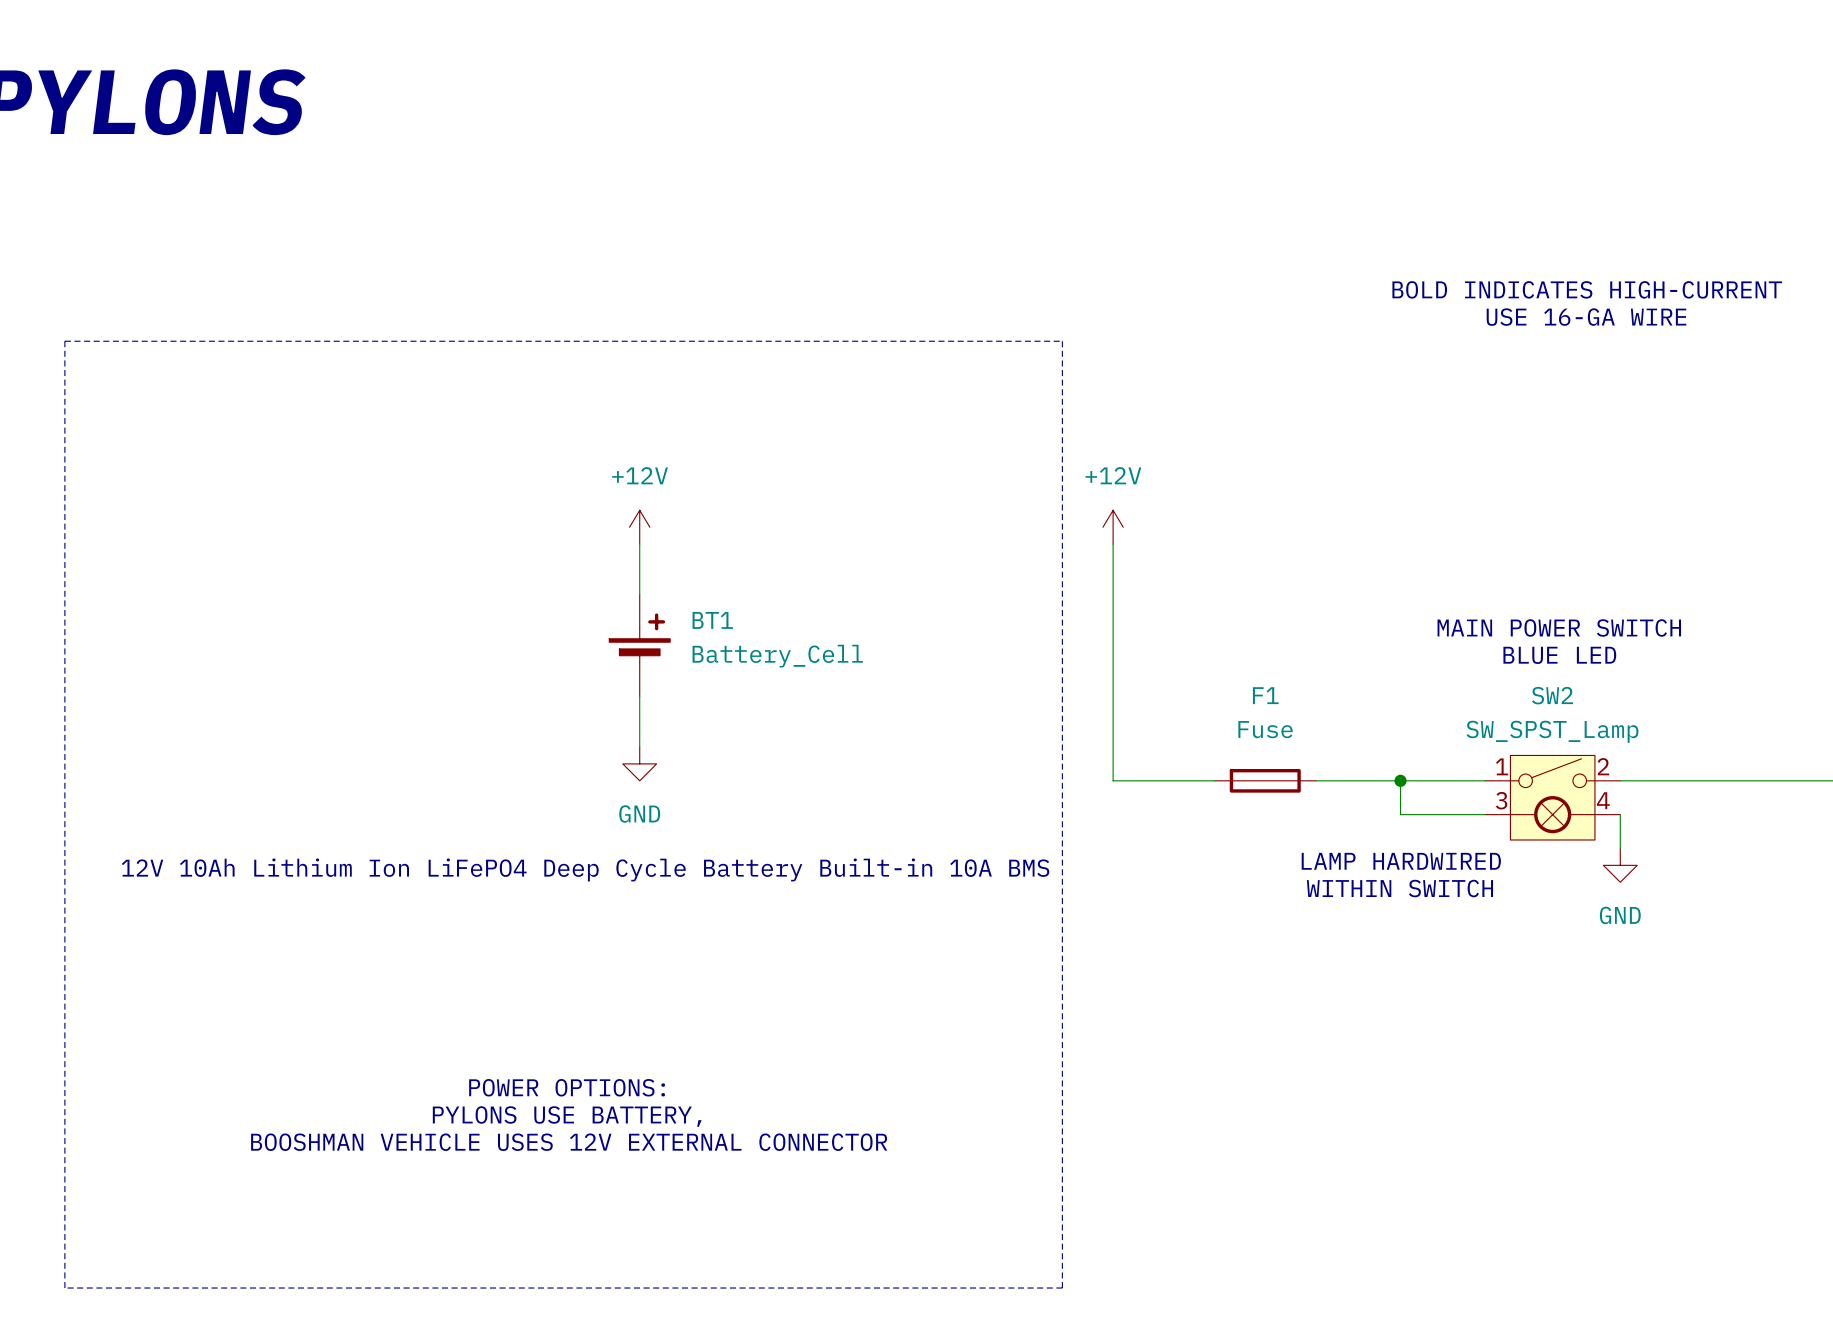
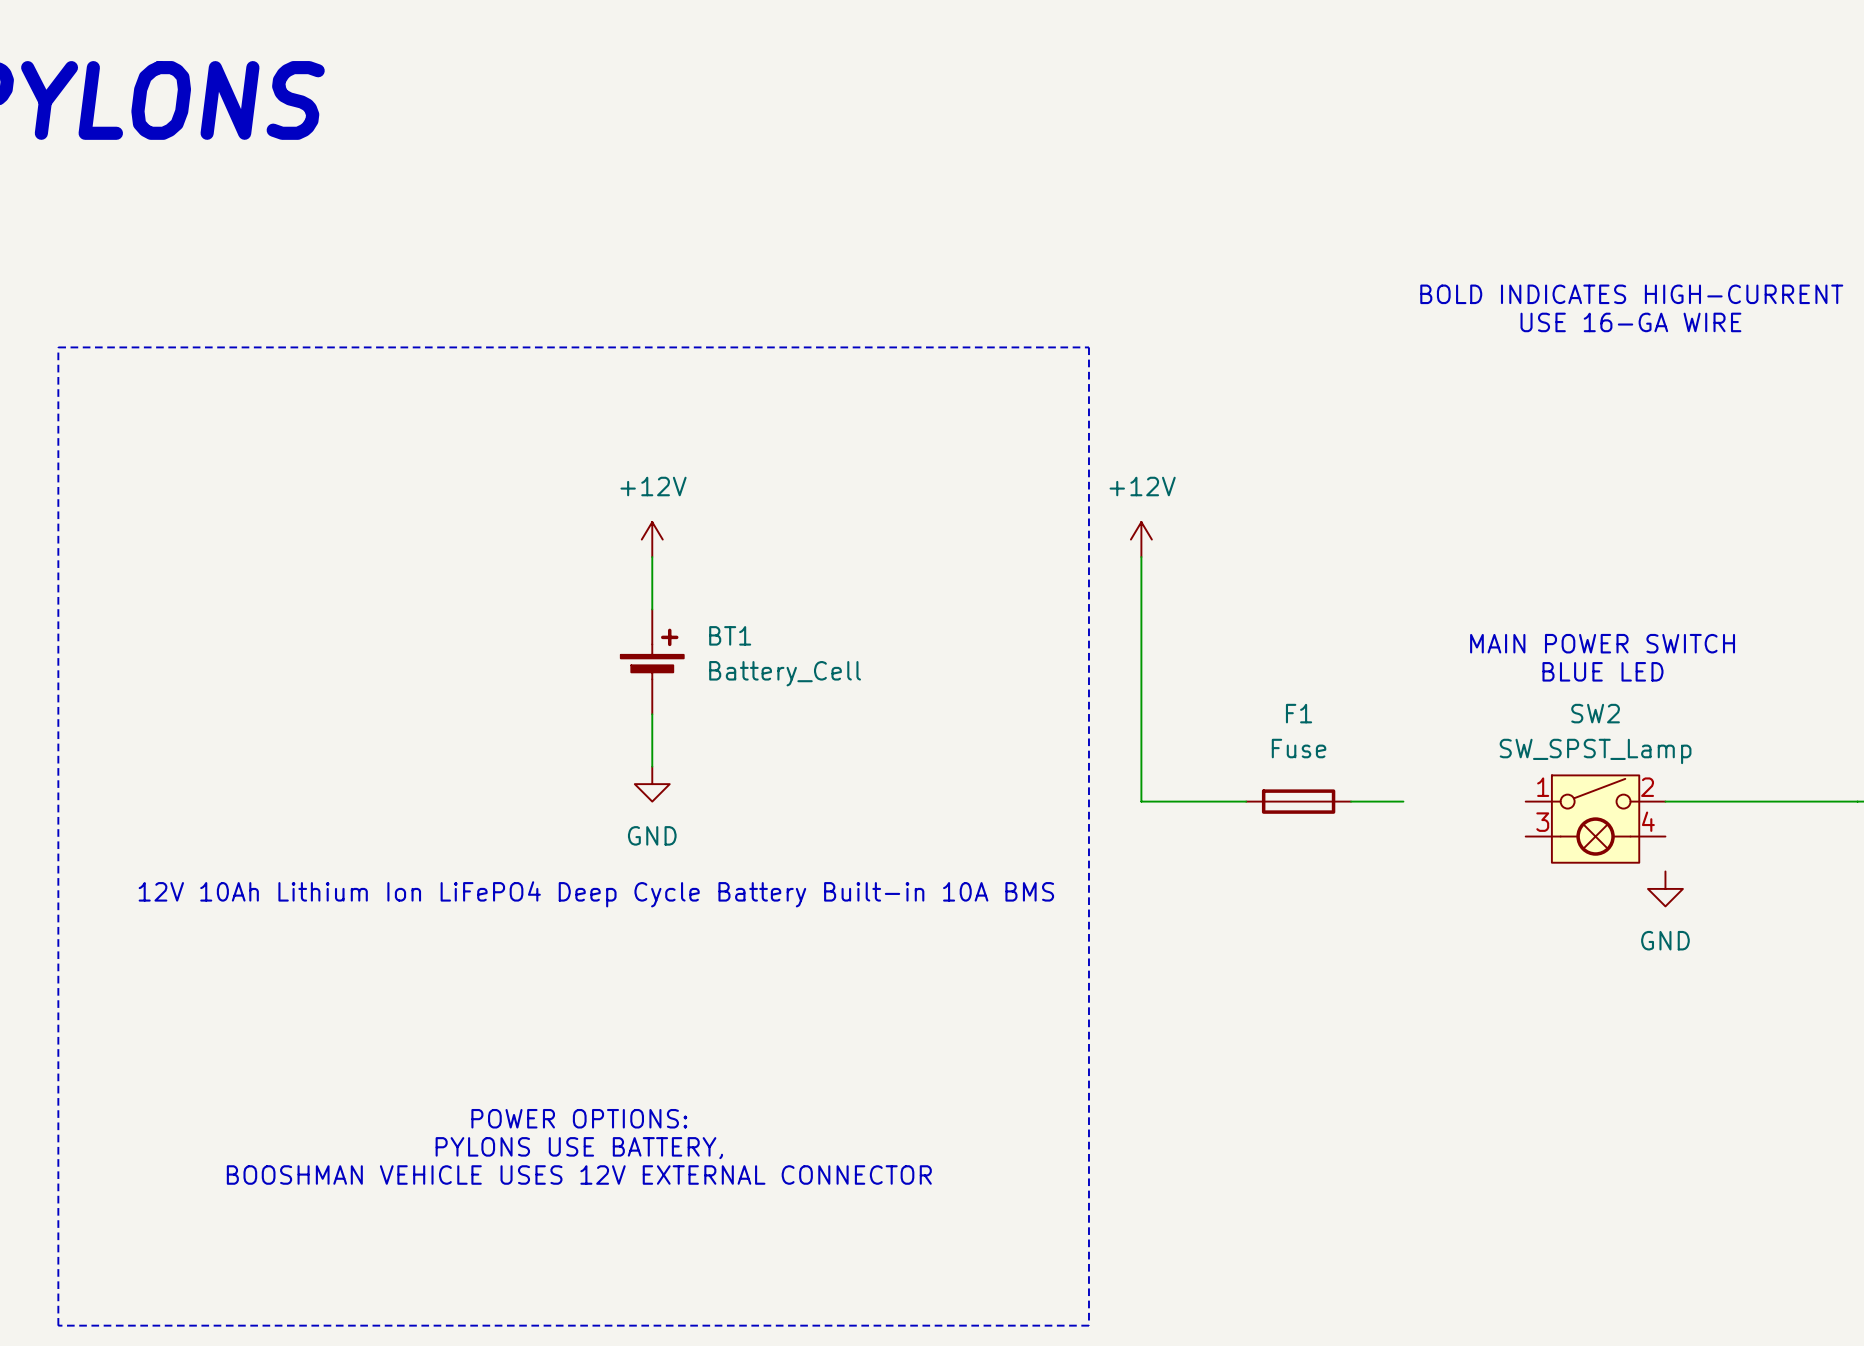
wire: (1366, 780) (1485, 780) -> none
wire: (1400, 780) (1400, 814) (1485, 814) -> none
junction: (1400, 780) -> none
wire: (1620, 814) (1620, 848) -> none
text: LAMP HARDWIRED (1401, 861) -> none
text: WITHIN SWITCH (1399, 888) -> none

